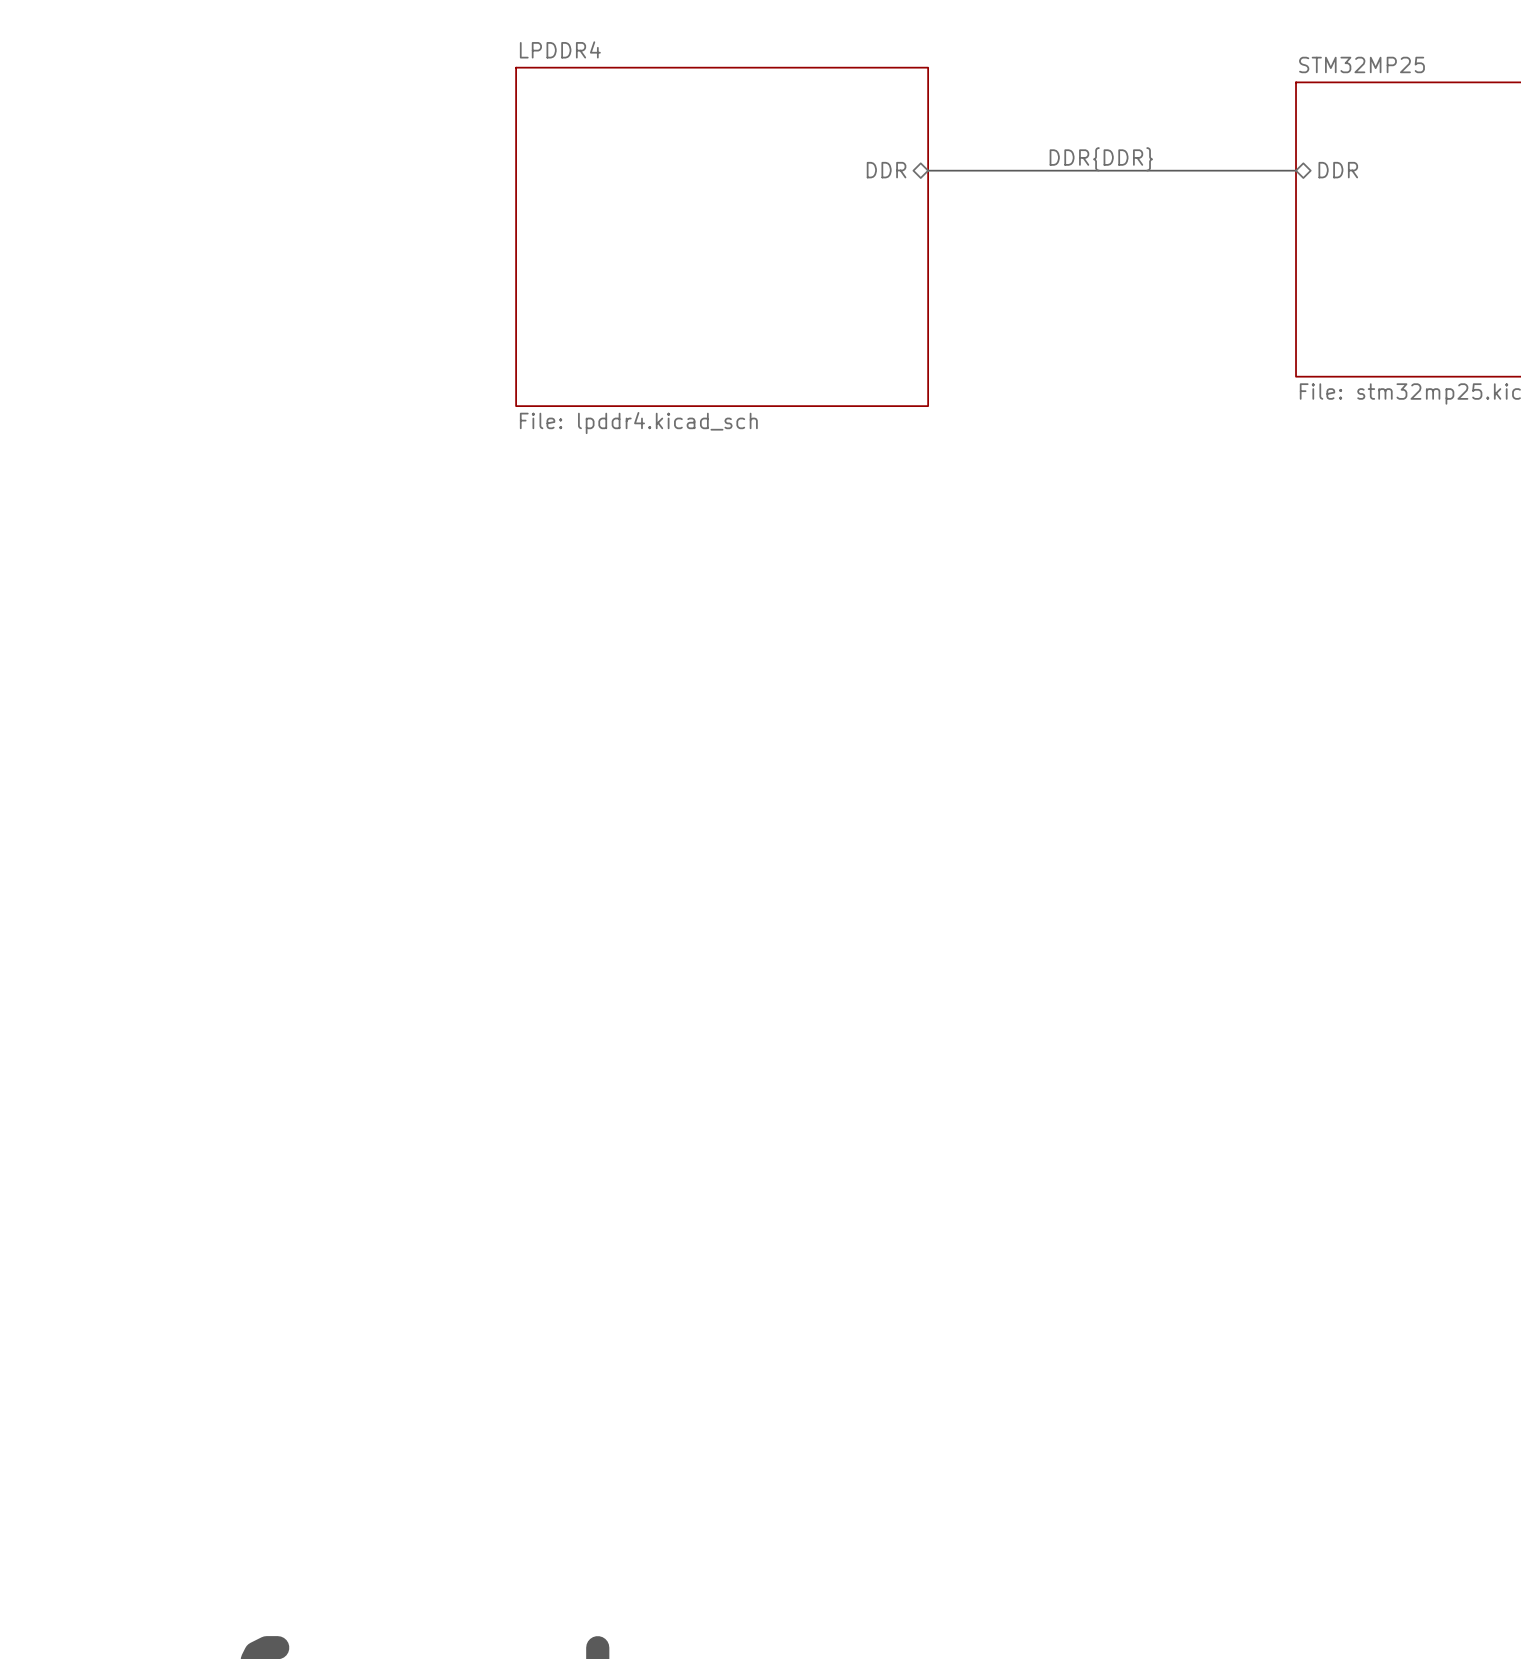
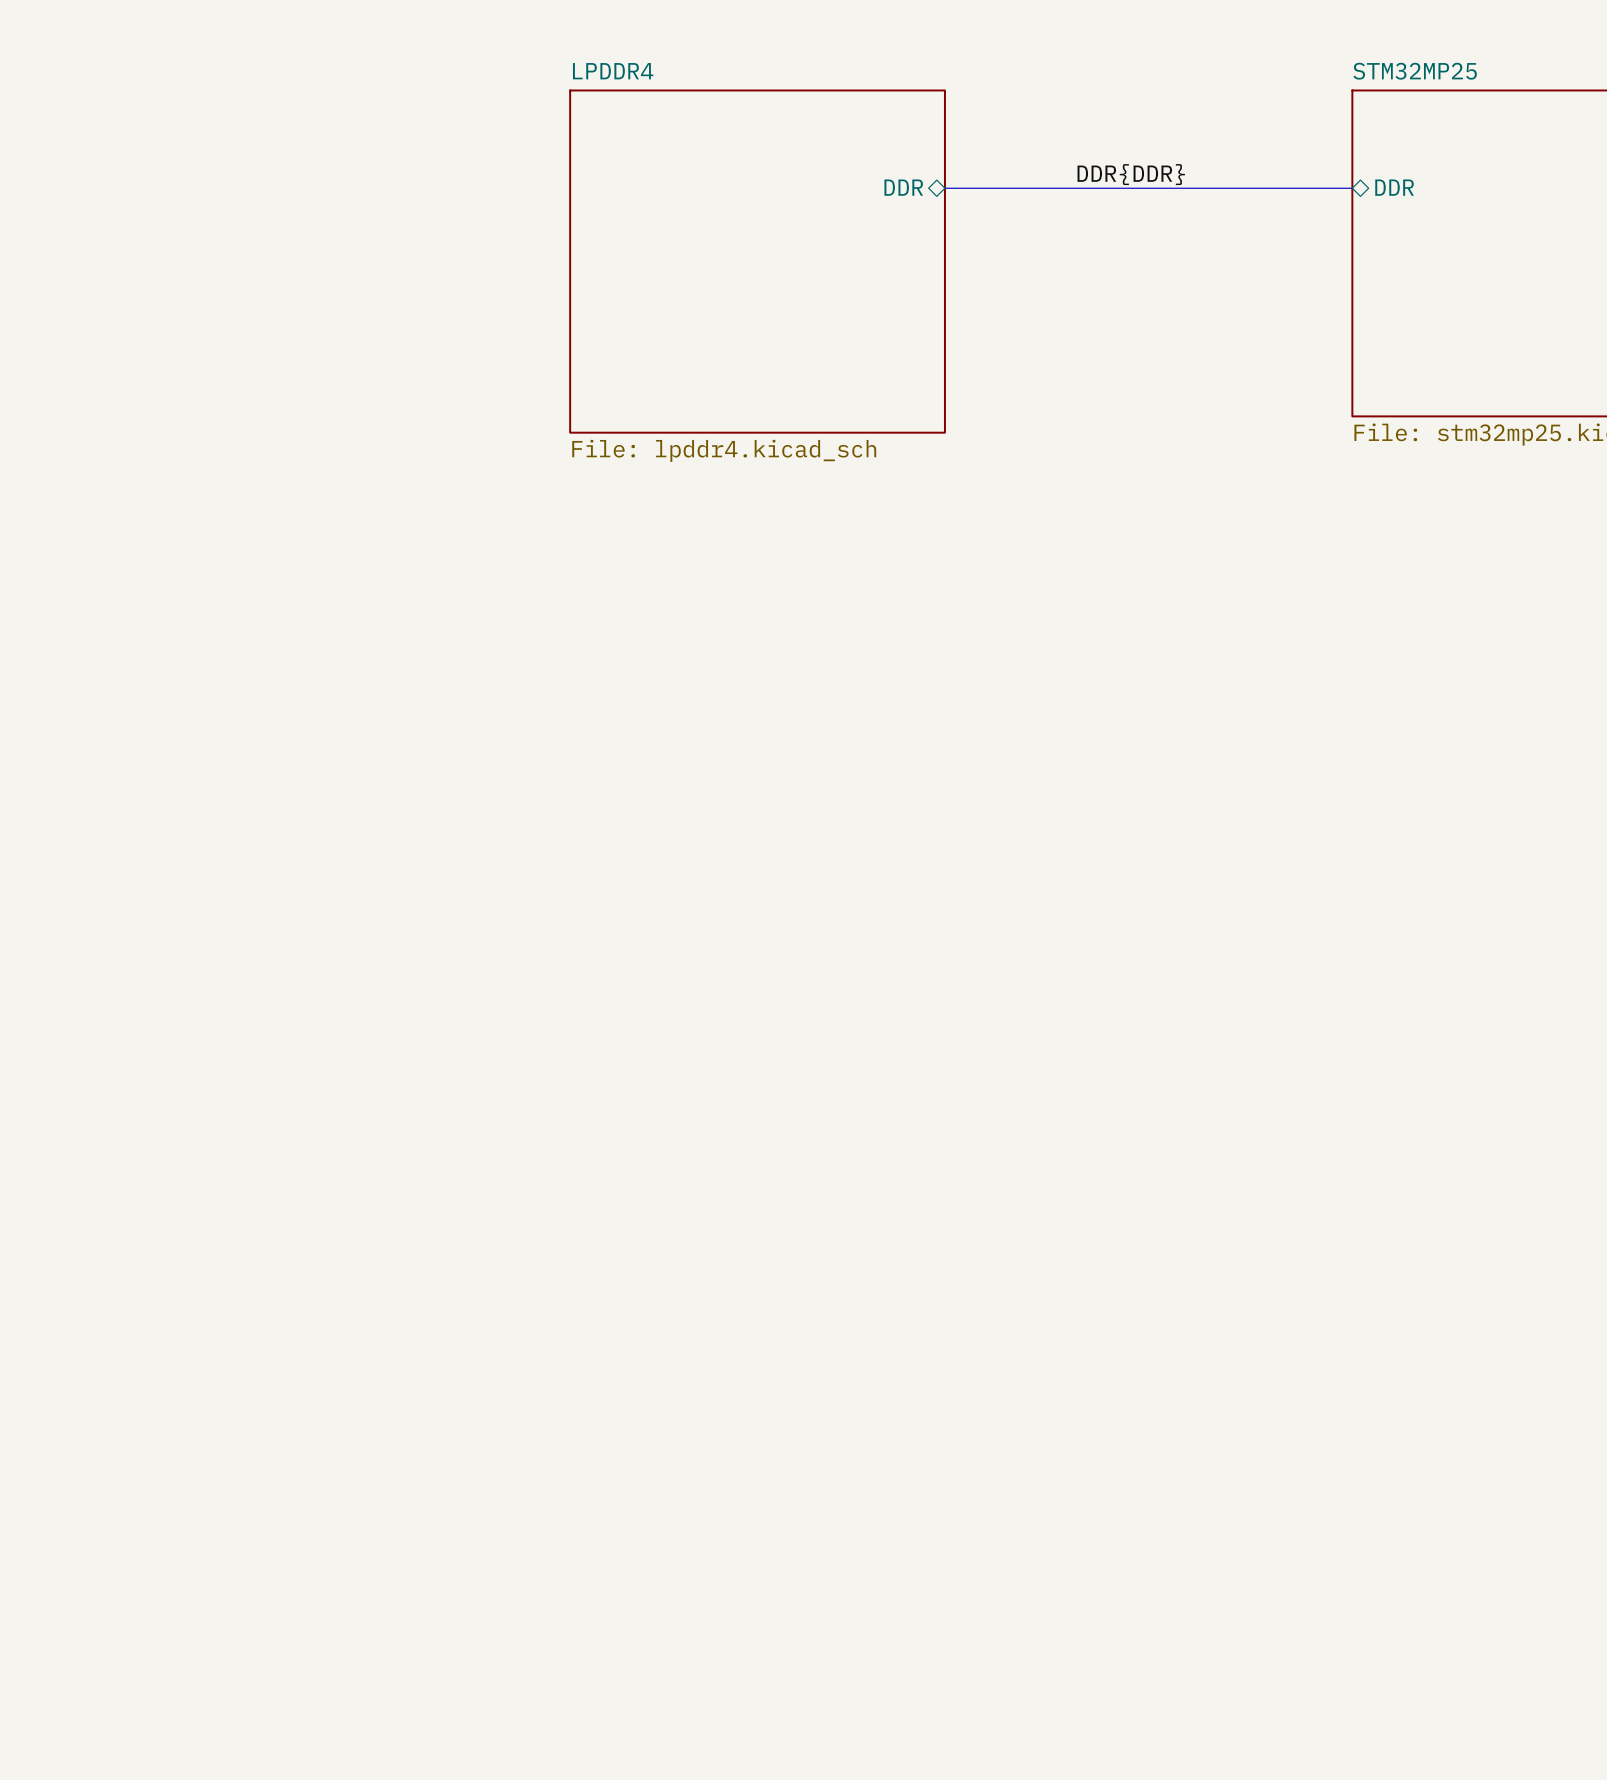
sheet LPDDR4 name position: LPDDR4 (560, 49) -> LPDDR4 (613, 71)
sheet LPDDR4 shape: [515, 66, 930, 408] -> [569, 89, 946, 434]
sheet LPDDR4 value position: File: lpddr4.kicad_sch (638, 423) -> File: lpddr4.kicad_sch (724, 450)

